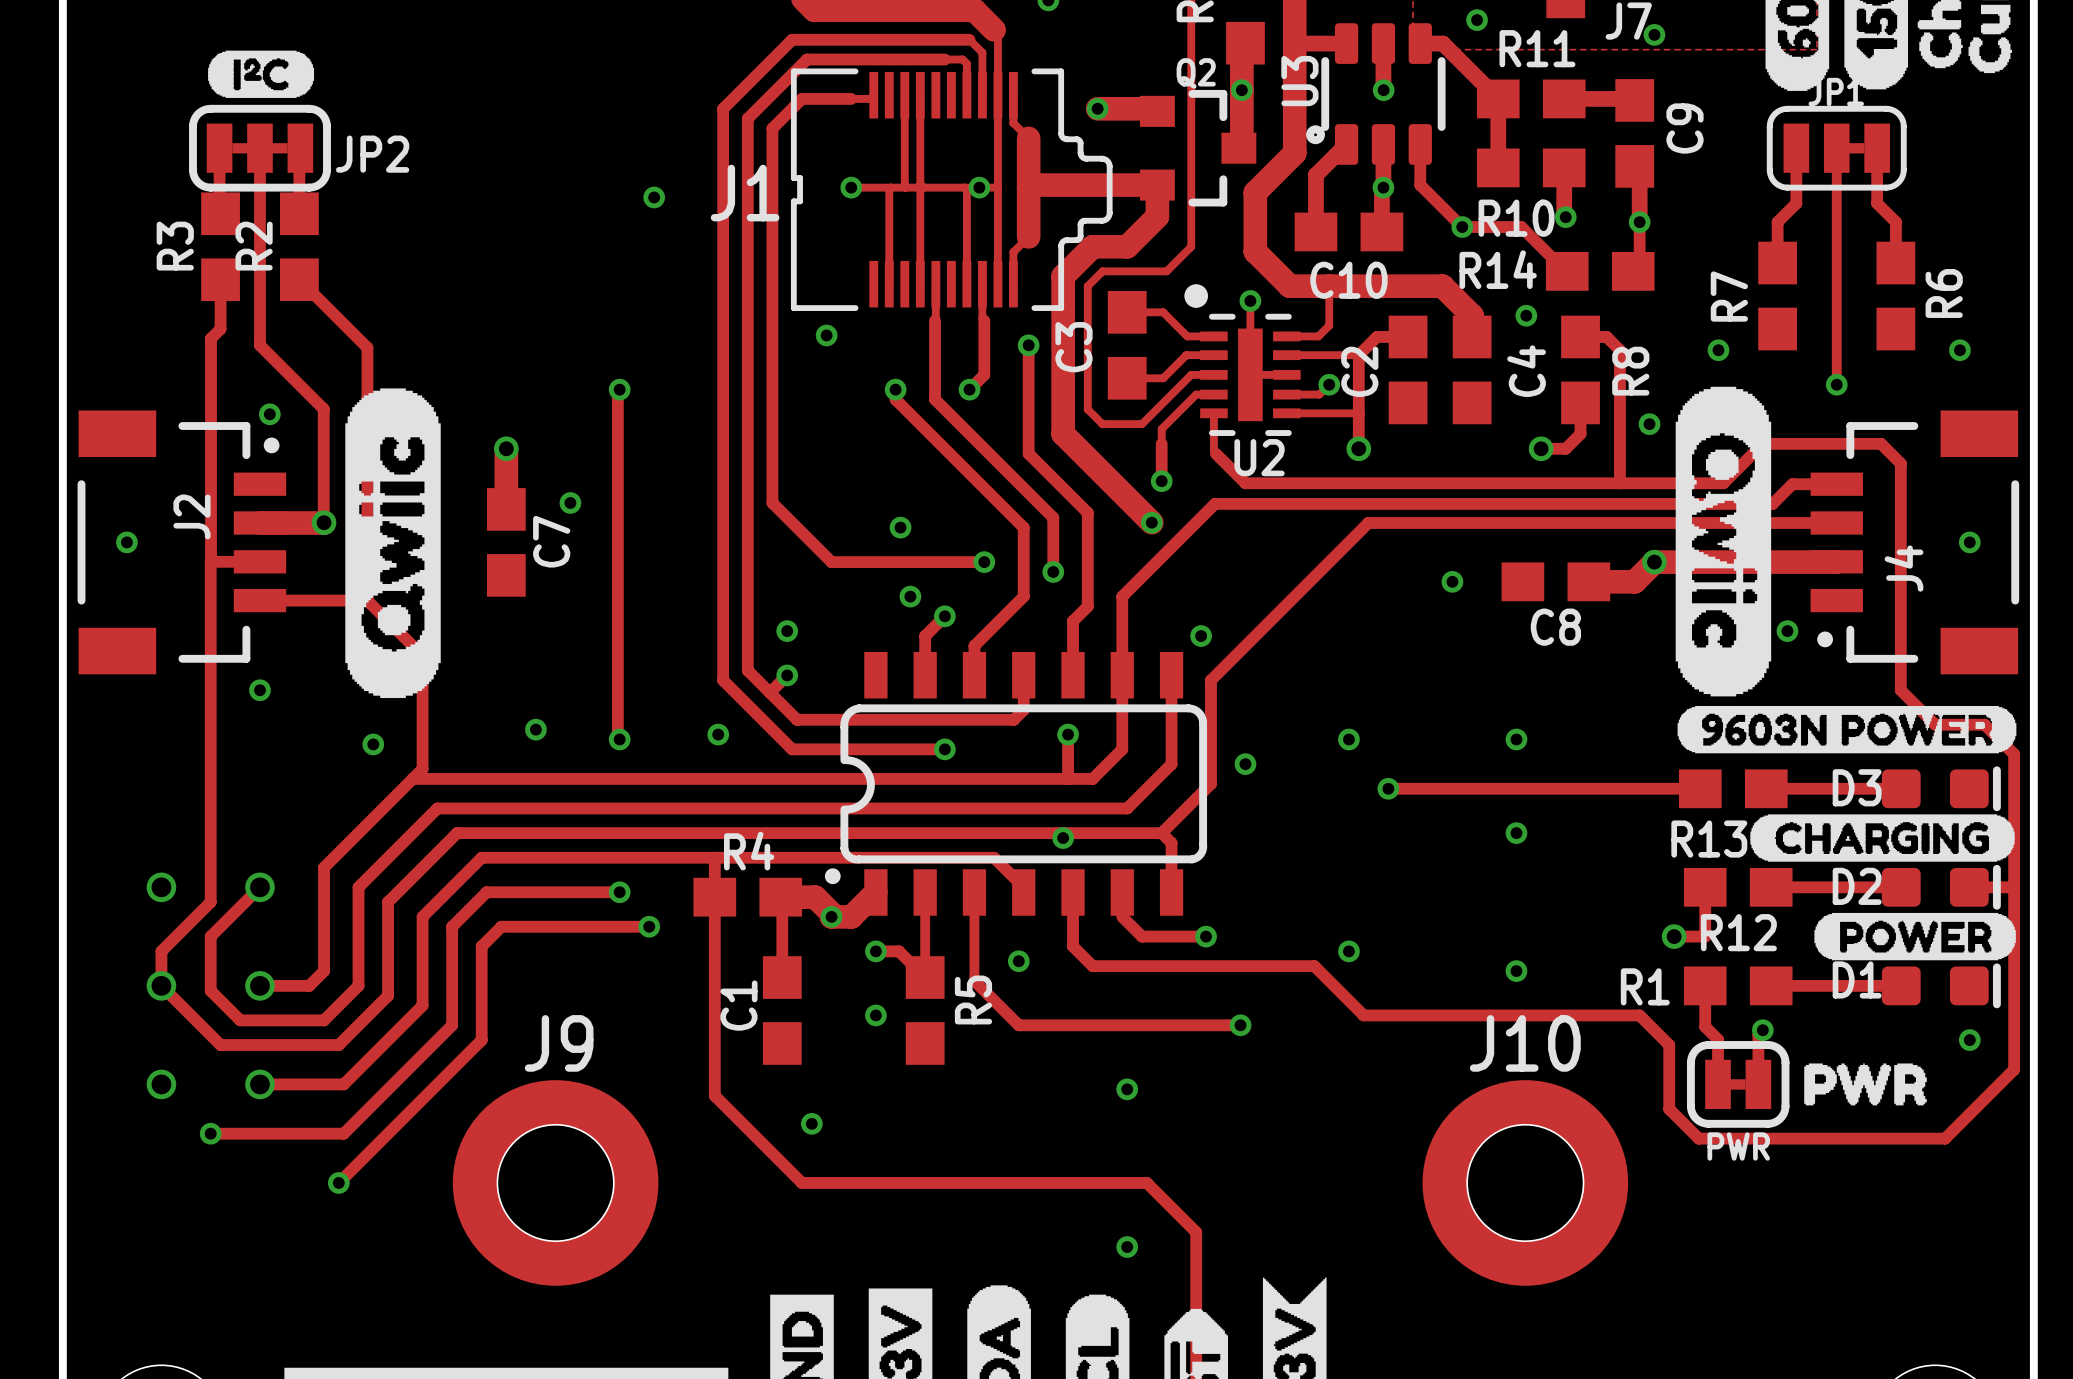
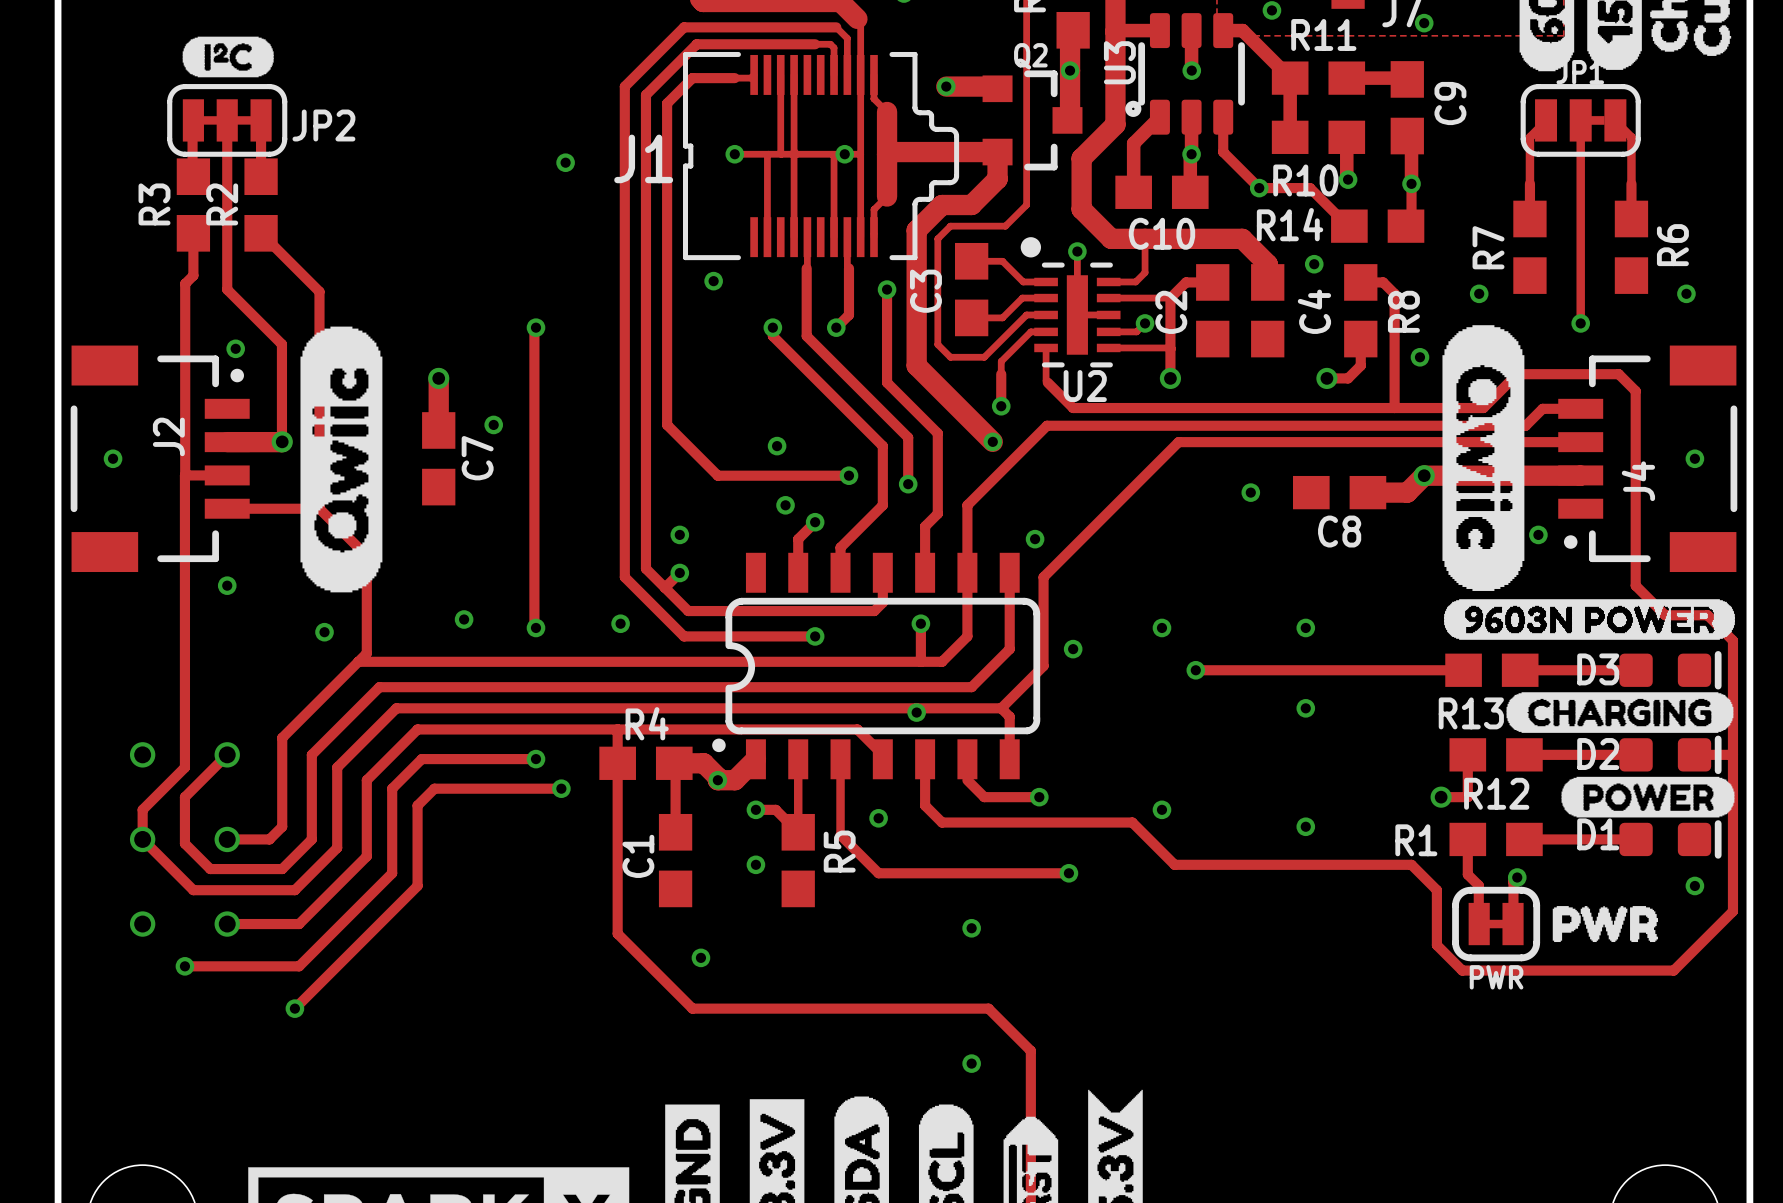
JP2 footprint: [189, 104, 331, 192] -> [167, 84, 288, 157]
track: (1796, 148) (1796, 203) (1777, 222) -> (1546, 120) (1529, 137) (1529, 183)
track: (1877, 148) (1877, 203) (1895, 222) -> (1614, 120) (1631, 137) (1631, 183)
PWR footprint: [1686, 1041, 1790, 1128] -> [1452, 886, 1541, 962]
J9: (555, 1182) -> none
J10: (1525, 1182) -> none

